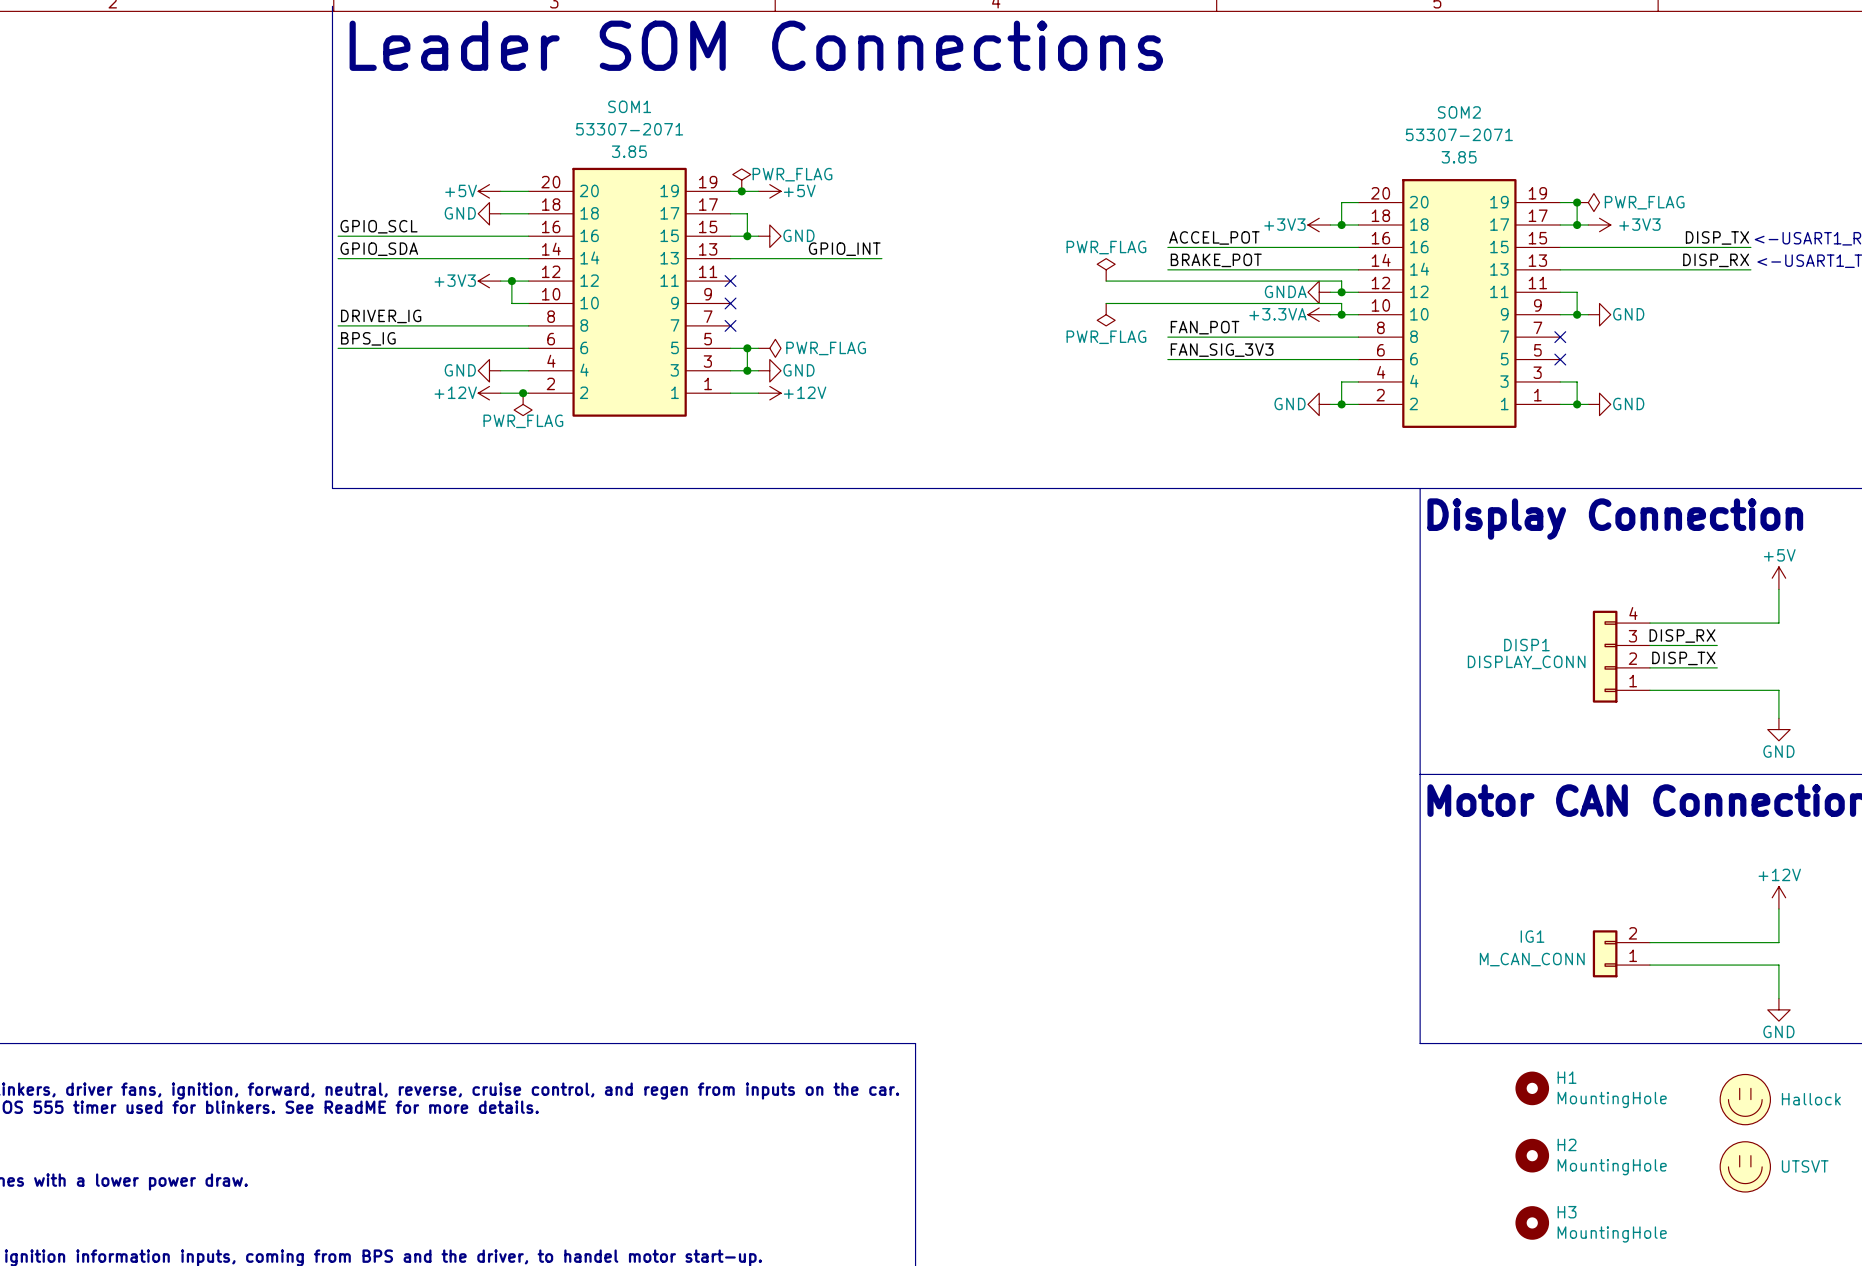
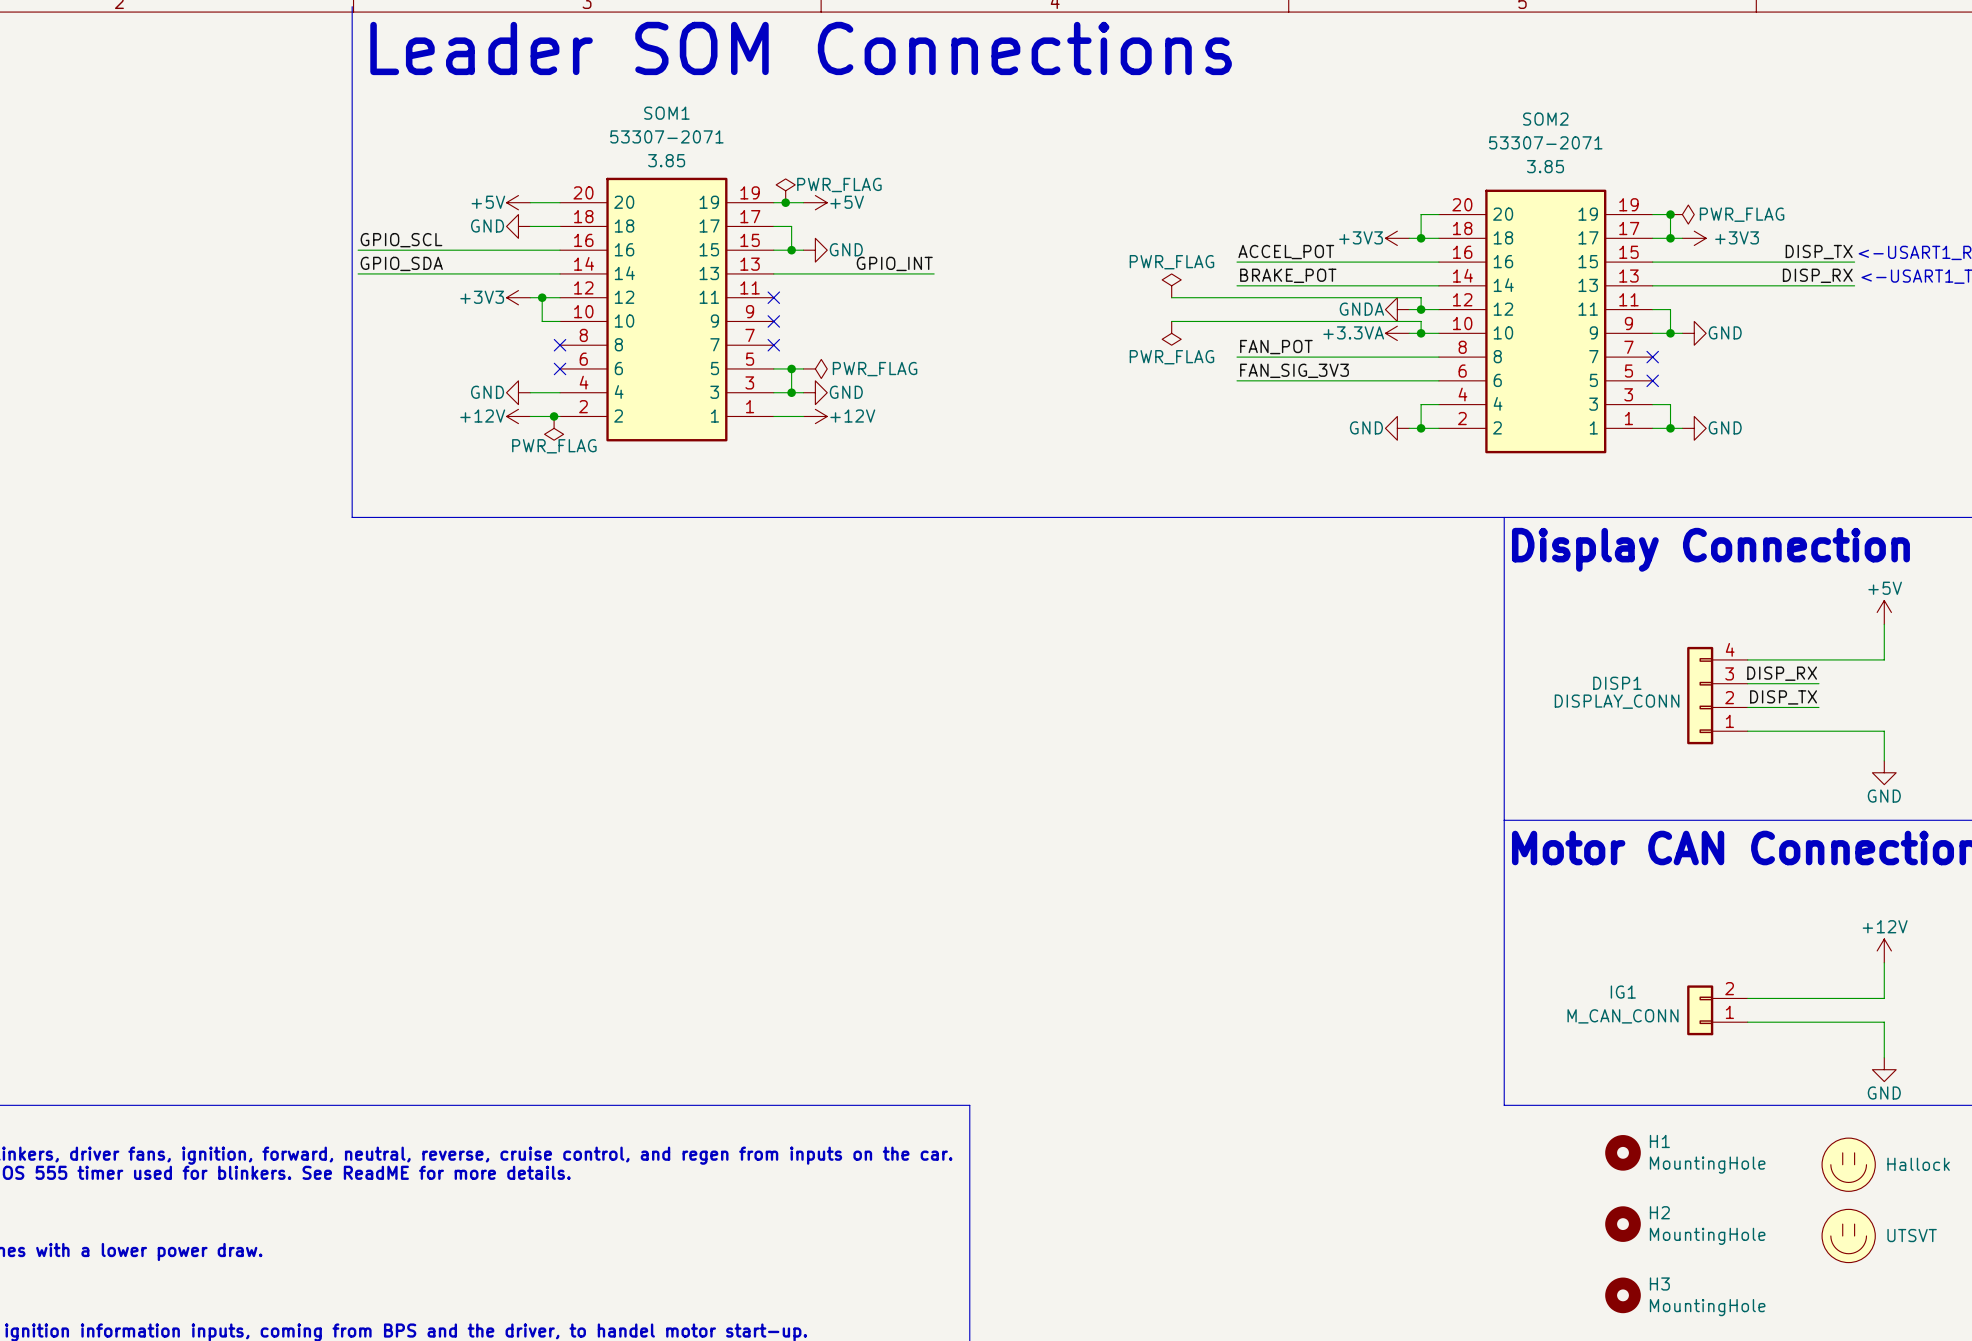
label: DRIVER_IG (381, 316) -> none
wire: (338, 325) (528, 325) -> none
no-connect mark: none -> (560, 345)
label: BPS_IG (368, 338) -> none
wire: (338, 348) (528, 348) -> none
no-connect mark: none -> (560, 368)

